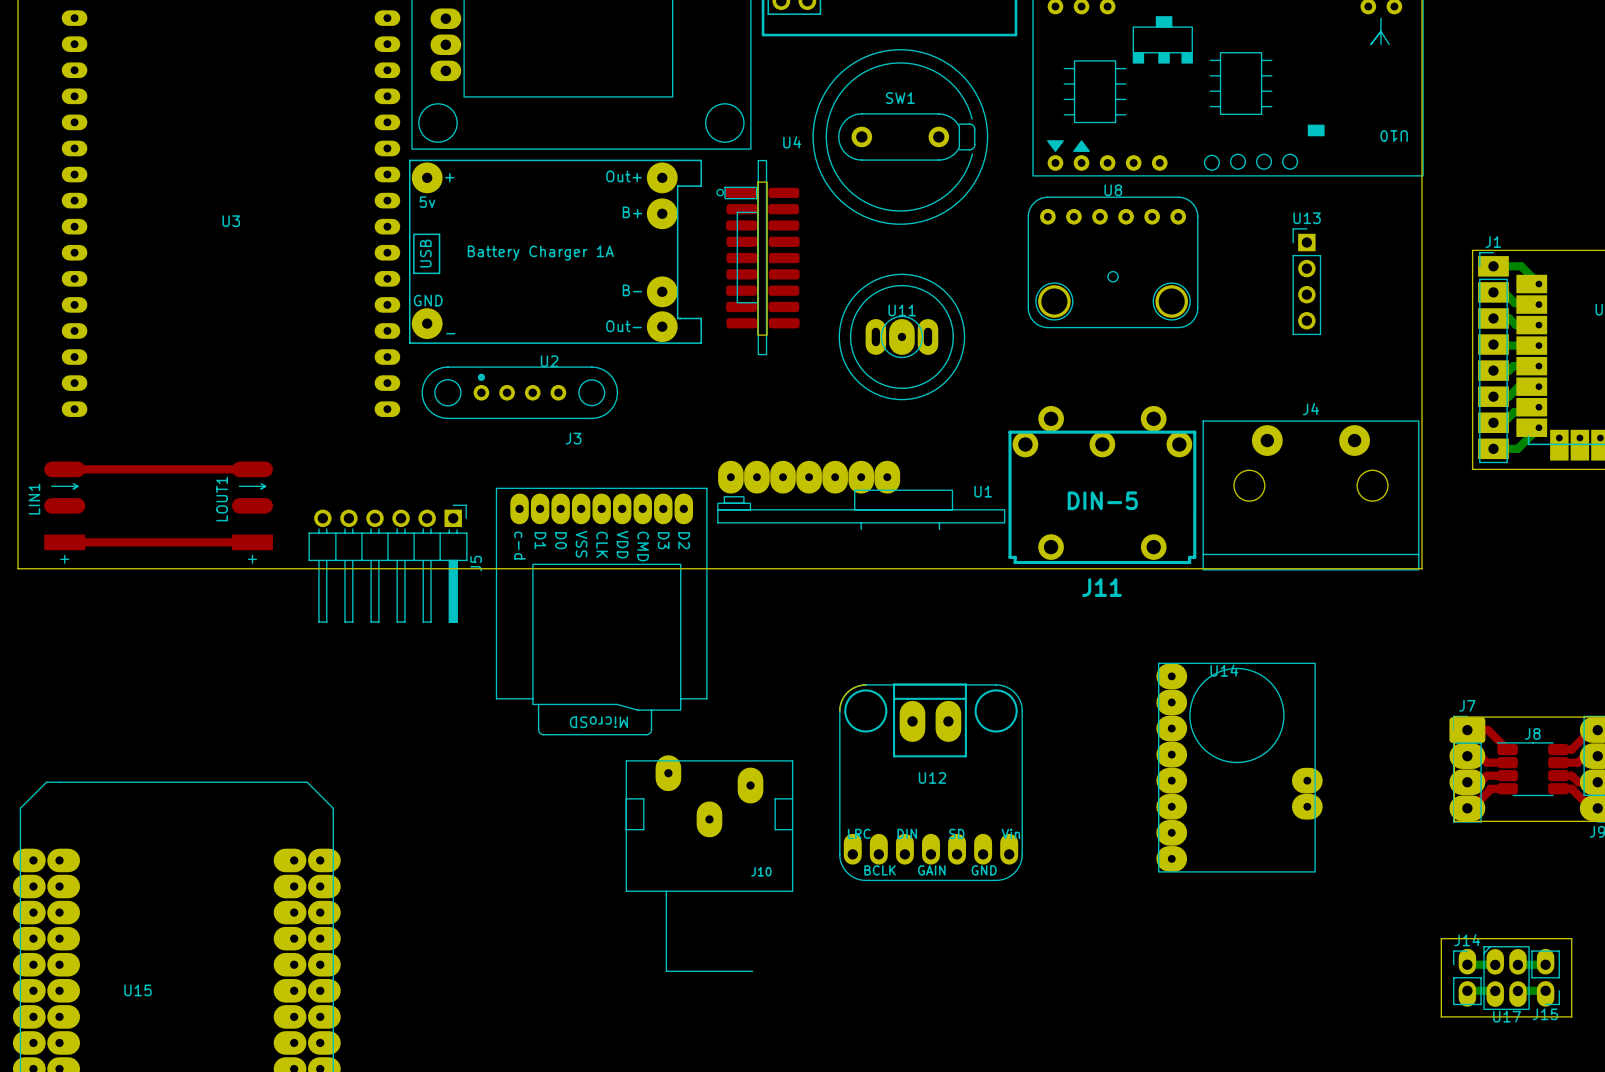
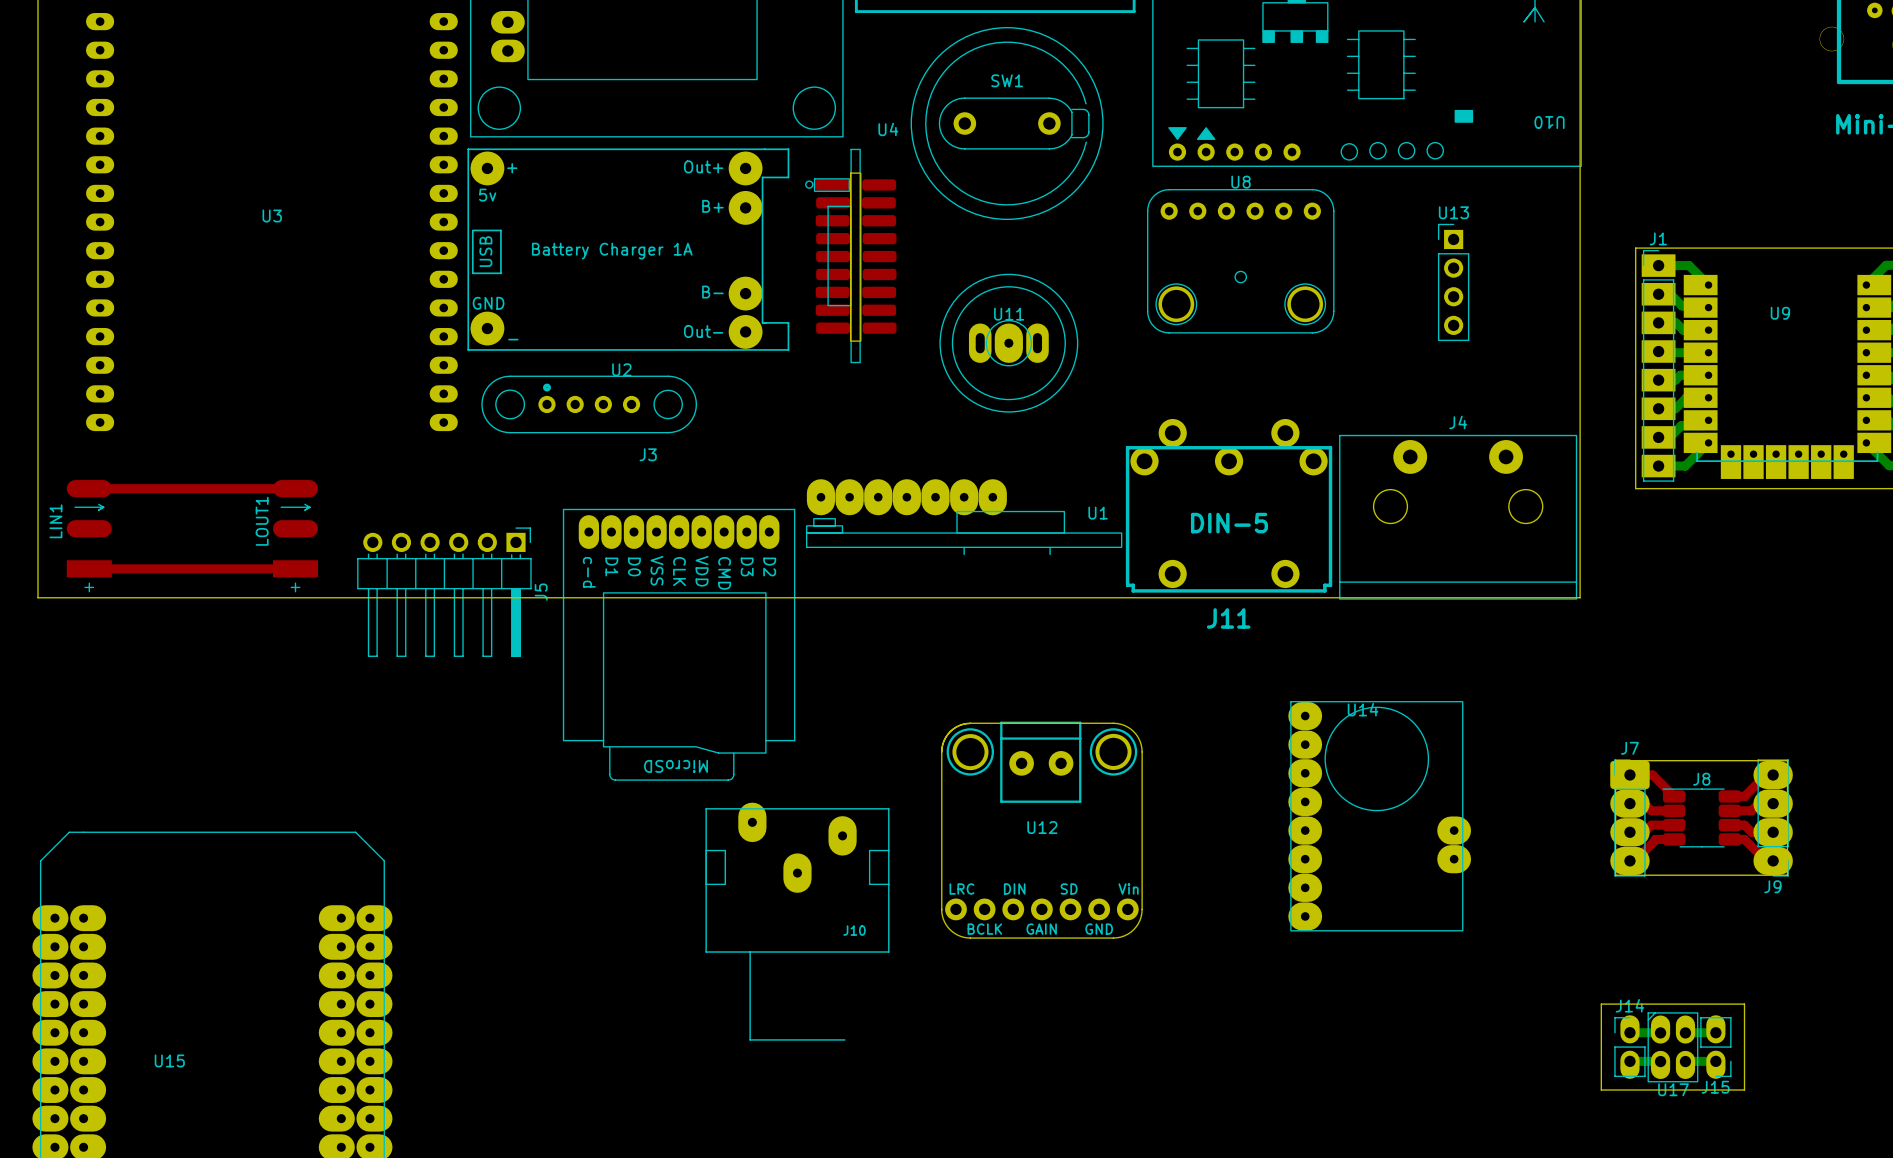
U12 footprint: [839, 683, 1023, 881] -> [941, 721, 1143, 939]

